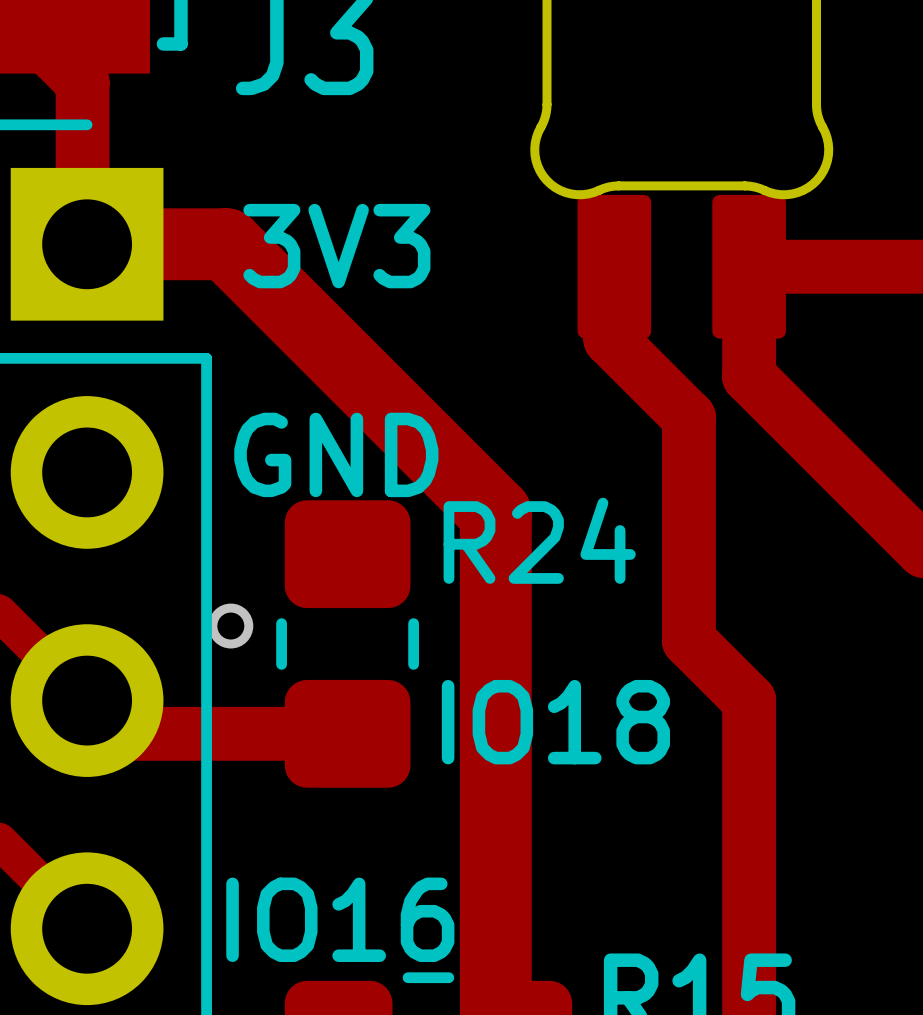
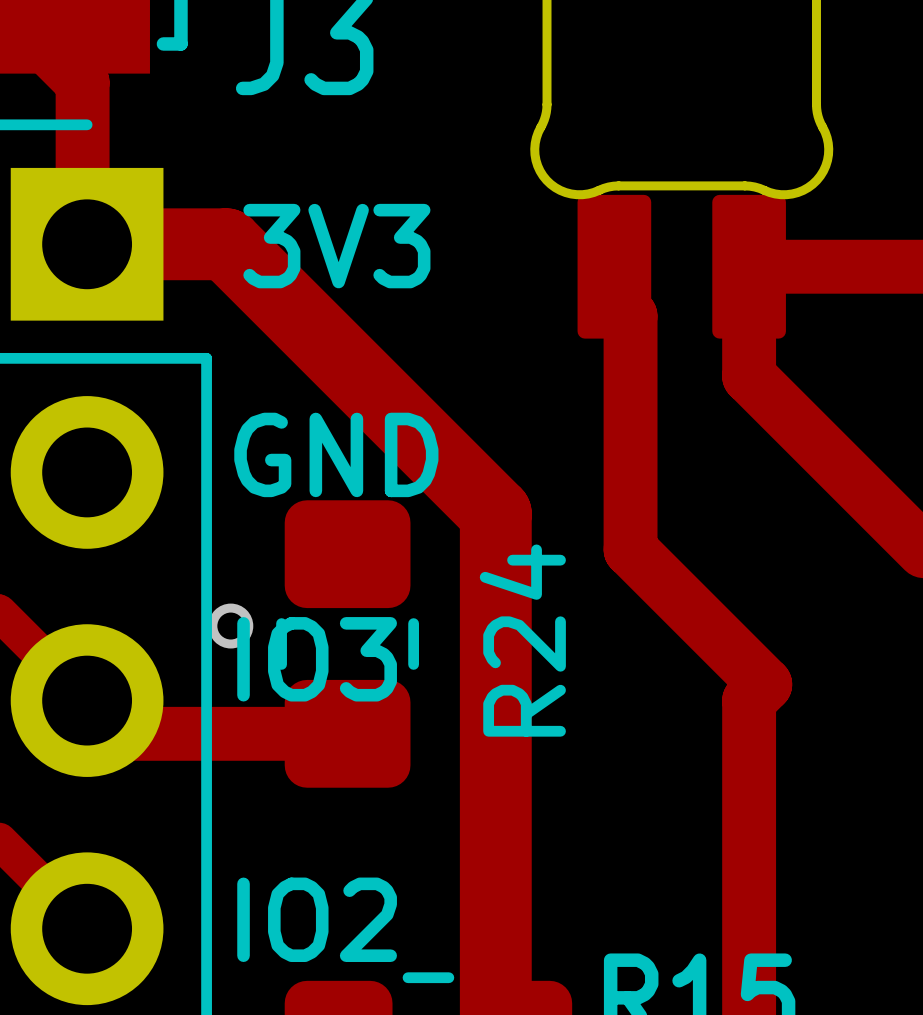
track: (610, 295) (610, 339) (688, 417) (688, 640) (749, 700) -> (610, 295) (630, 316) (630, 549) (765, 684) (749, 700)
R24 name rotation: 0° (539, 540) -> 90° counterclockwise (522, 640)
text: none -> IO3 (317, 659)
text: IO18 (555, 722) -> none
text: IO16 (340, 919) -> IO2 (317, 919)

